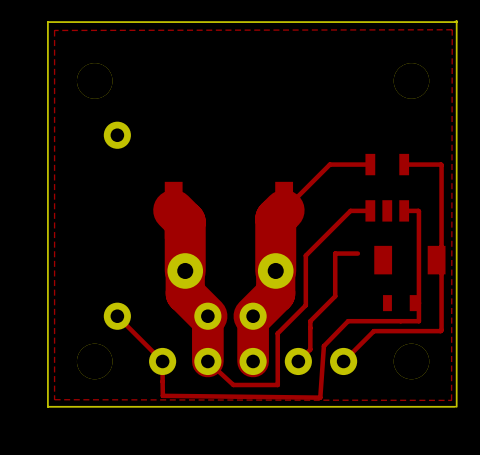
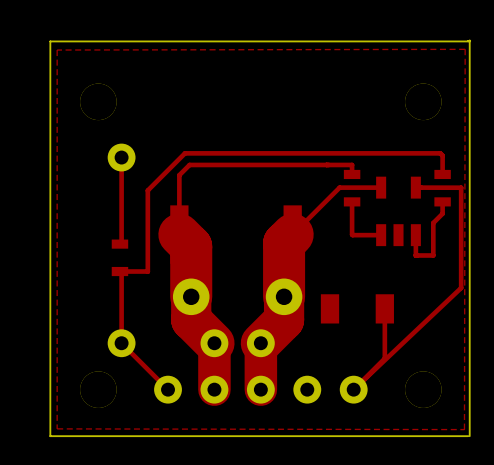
top track: none -> (121, 157) (121, 242) (119, 244)
top track: none -> (352, 174) (352, 164) (189, 164) (179, 175) (179, 234)
top track: none -> (442, 174) (442, 155) (440, 153) (184, 153) (147, 190) (147, 271)
top track: (409, 164) (441, 165) (441, 246) (436, 260) (441, 273) (441, 330) (373, 331) -> (421, 187) (461, 187) (461, 287) (353, 389)
part: none -> (352, 188)
part: none -> (442, 188)
top track: (350, 210) (305, 255) (305, 305) (277, 333) (277, 385) (233, 385) (207, 361) -> (360, 235) (352, 234) (352, 201)
top track: (404, 210) (418, 211) (418, 321) (348, 321) (323, 346) (320, 397) (162, 395) (162, 361) -> (415, 235) (415, 255) (433, 255) (433, 222) (442, 213) (442, 201)
part: none -> (119, 257)
top track: none -> (147, 271) (119, 271) (121, 273) (121, 343)
top track: (357, 253) (335, 253) (335, 296) (310, 321) (310, 349) (298, 361) -> none
part position: (409, 260) -> (357, 308)
top track: none -> (384, 308) (384, 358)
part: (400, 303) -> none

